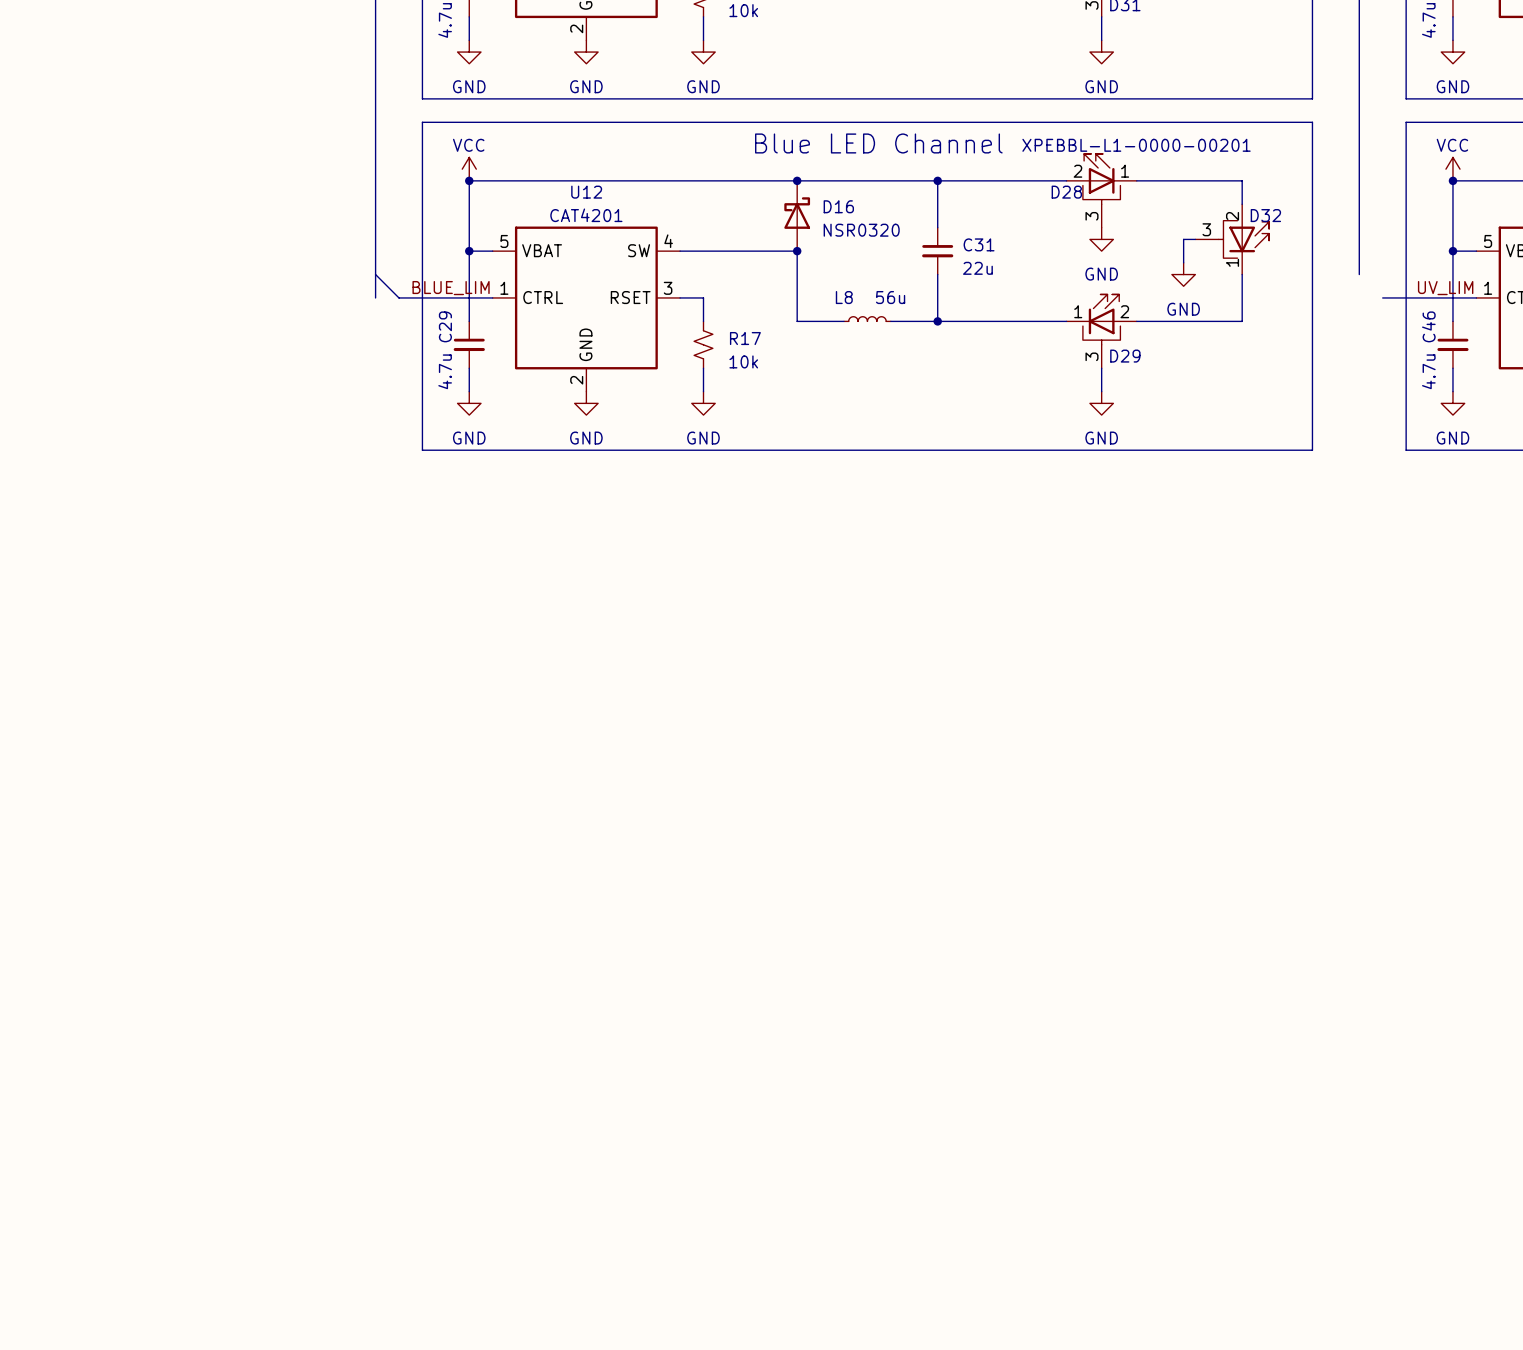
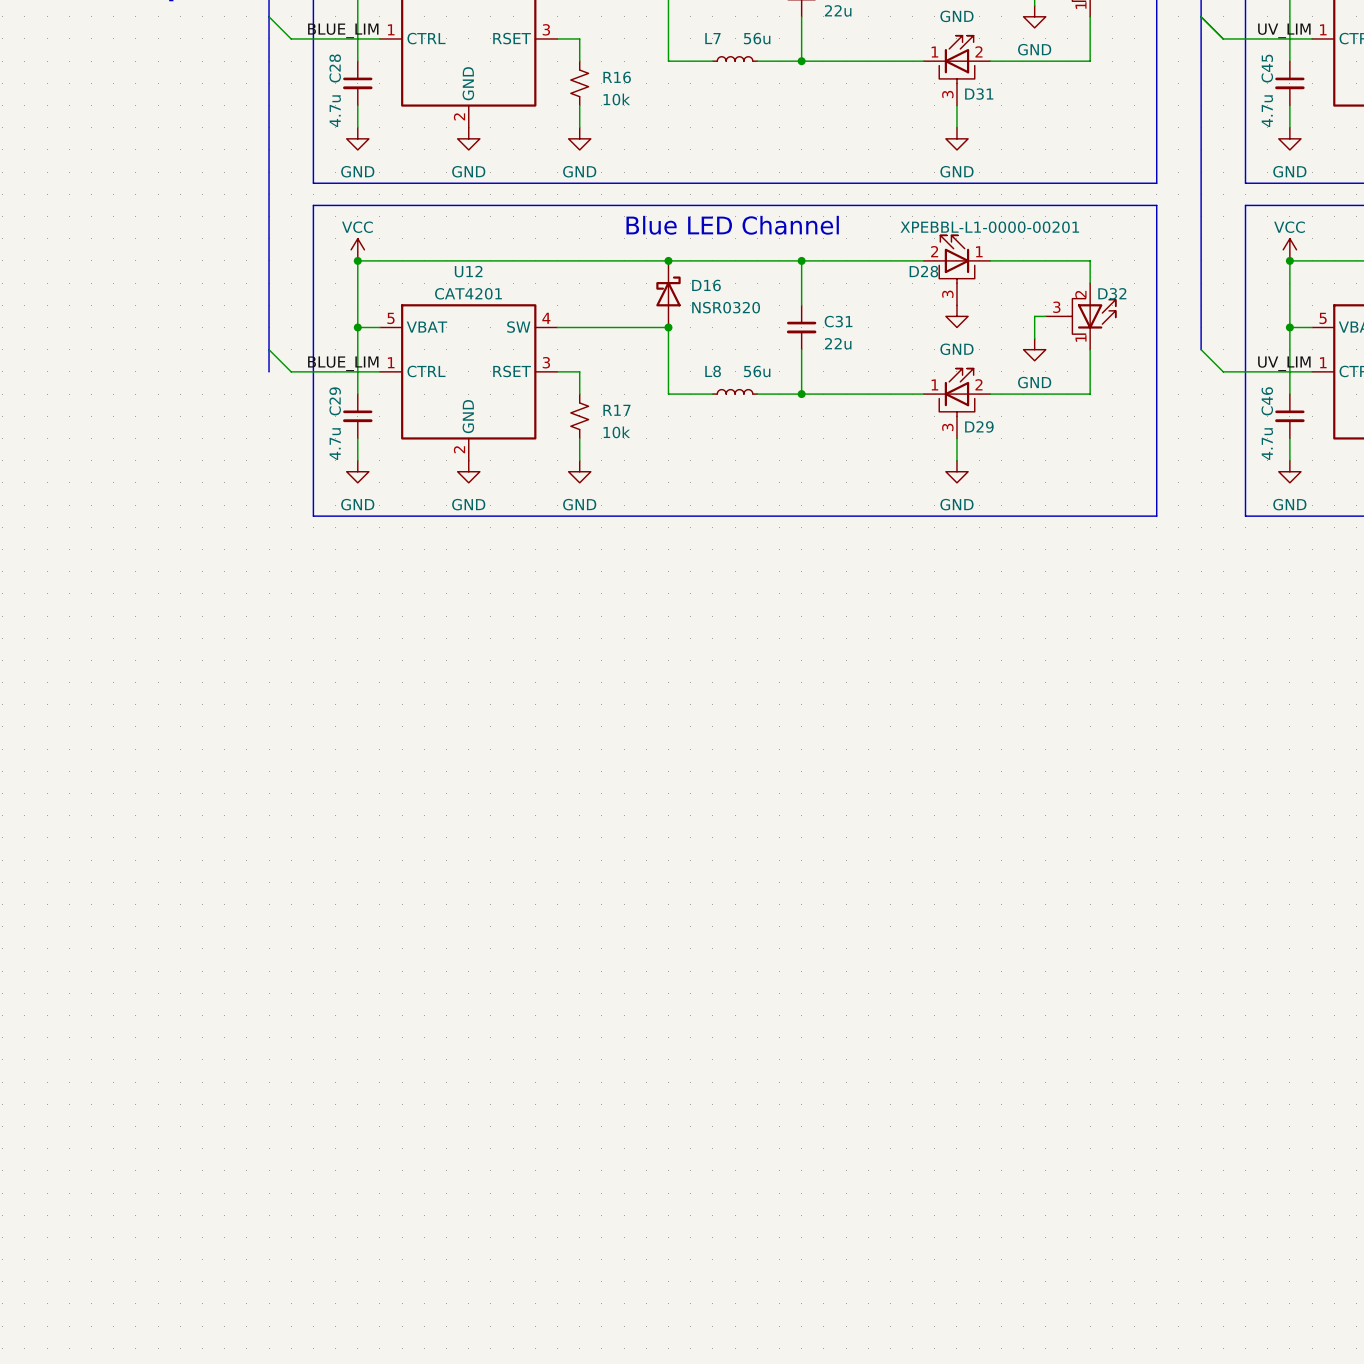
wire: none -> (1201, 349) (1223, 371)

